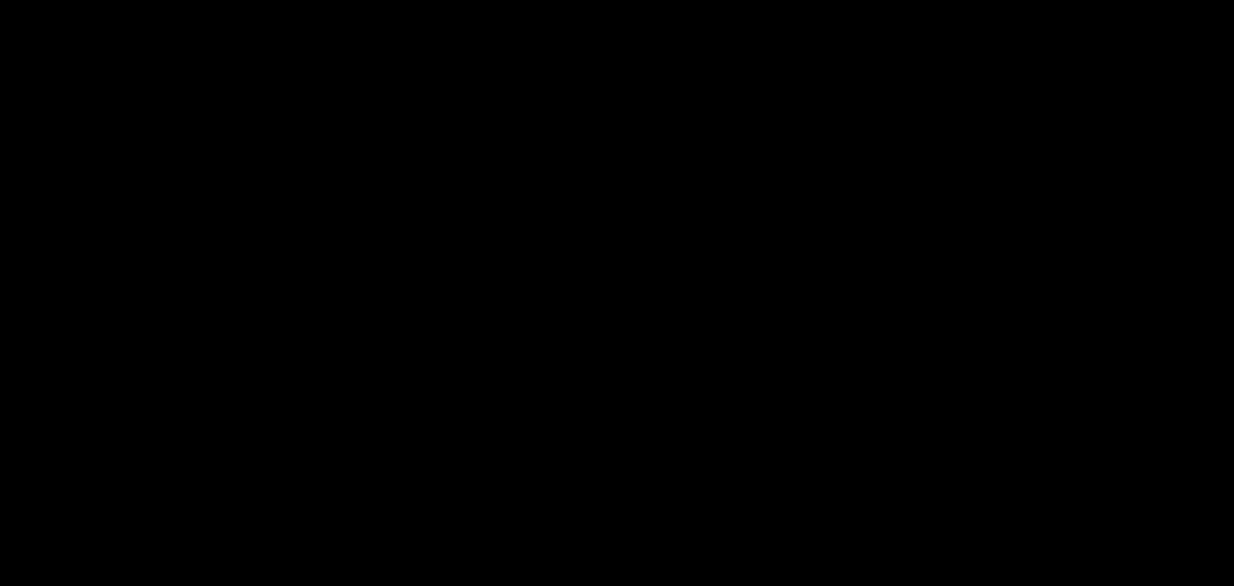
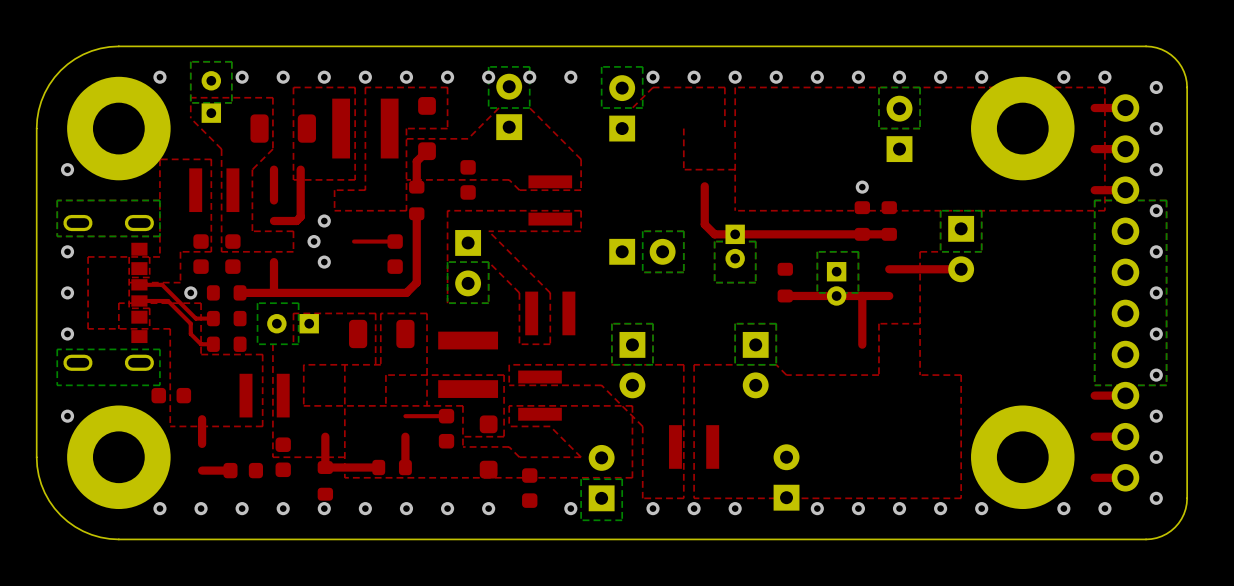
board edge: none -> (1146, 46) (118, 46) (91, 50) (75, 58) (54, 77) (41, 101) (37, 119) (36, 457) (41, 484) (54, 508) (75, 526) (100, 537) (118, 539) (1146, 539) (1161, 536) (1178, 523) (1183, 514) (1187, 498) (1187, 87) (1183, 71) (1175, 58) (1161, 49) (1146, 46)
bottom zone outline: none -> (231, 61) (190, 61) (190, 102) (231, 102) (231, 61)
bottom zone outline: none -> (529, 66) (488, 66) (488, 108) (529, 108) (529, 66)
bottom zone outline: none -> (642, 66) (642, 108) (601, 108) (601, 66) (642, 66)
via: none -> (159, 77)
via: none -> (242, 77)
via: none -> (283, 77)
via: none -> (324, 77)
via: none -> (365, 77)
via: none -> (406, 77)
via: none -> (447, 77)
via: none -> (488, 77)
via: none -> (529, 77)
via: none -> (570, 77)
via: none -> (652, 77)
via: none -> (694, 77)
via: none -> (735, 77)
via: none -> (776, 77)
via: none -> (817, 77)
via: none -> (858, 77)
via: none -> (899, 77)
via: none -> (940, 77)
via: none -> (981, 77)
via: none -> (1063, 77)
via: none -> (1104, 77)
top zone outline: none -> (355, 87) (355, 179) (293, 179) (293, 87) (355, 87)
top zone outline: none -> (447, 87) (365, 87) (365, 190) (334, 190) (334, 210) (406, 210) (406, 128) (447, 128) (447, 87)
bottom zone outline: none -> (920, 87) (878, 87) (878, 128) (920, 128) (920, 87)
top zone outline: none -> (1104, 87) (1104, 210) (735, 210) (735, 87) (1104, 87)
via: none -> (1156, 87)
part: none -> (211, 96)
top zone outline: none -> (190, 97) (272, 97) (272, 149) (252, 169) (252, 231) (293, 231) (293, 251) (221, 251) (221, 149) (190, 118) (190, 61) (231, 61) (231, 102) (190, 102)
part: none -> (509, 106)
top zone outline: none -> (498, 108) (468, 138) (406, 138)
top zone outline: none -> (529, 108) (581, 159) (581, 190) (519, 190) (509, 179) (406, 179)
part: none -> (622, 108)
top zone outline: none -> (632, 108) (652, 87) (724, 87) (724, 128)
top track: none -> (1125, 108) (1094, 108)
part: none -> (118, 128)
part: none -> (283, 128)
part: none -> (365, 128)
part: none -> (427, 128)
top zone outline: none -> (683, 128) (683, 169) (735, 169)
part: none -> (899, 128)
part: none -> (1022, 128)
via: none -> (1156, 128)
top track: none -> (1125, 149) (1094, 149)
top track: none -> (427, 151) (416, 161) (416, 187)
via: none -> (67, 169)
top track: none -> (273, 169) (273, 200)
top track: none -> (300, 169) (300, 216) (296, 221) (273, 221)
via: none -> (1156, 169)
part: none -> (468, 179)
top track: none -> (704, 186) (704, 224) (714, 234) (889, 234)
via: none -> (862, 187)
part: none -> (214, 190)
top track: none -> (1125, 190) (1094, 190)
bottom zone outline: none -> (159, 200) (159, 236) (57, 236) (57, 200) (159, 200)
part: none -> (416, 200)
part: none -> (550, 200)
bottom zone outline: none -> (1166, 200) (1094, 200) (1094, 385) (1166, 385) (1166, 200)
bottom zone outline: none -> (981, 210) (940, 210) (940, 251) (981, 251) (981, 210)
top zone outline: none -> (981, 210) (981, 251) (920, 251) (920, 375) (961, 375) (961, 498) (694, 498) (694, 364) (776, 364)
via: none -> (1156, 210)
top track: none -> (416, 213) (416, 282) (406, 292) (240, 292)
via: none -> (324, 221)
part: none -> (862, 221)
part: none -> (889, 221)
bottom zone outline: none -> (683, 231) (642, 231) (642, 272) (683, 272) (683, 231)
via: none -> (314, 241)
top track: none -> (395, 241) (354, 241)
bottom zone outline: none -> (755, 241) (714, 241) (714, 282) (755, 282) (755, 241)
part: none -> (735, 246)
part: none -> (961, 249)
via: none -> (67, 251)
part: none -> (642, 251)
bottom zone outline: none -> (858, 251) (817, 251) (817, 292) (858, 292) (858, 251)
via: none -> (1156, 251)
part: none -> (201, 254)
part: none -> (232, 254)
part: none -> (395, 254)
top zone outline: none -> (129, 256) (129, 308) (149, 308) (149, 328)
top zone outline: none -> (149, 256) (149, 277) (129, 277)
top track: none -> (273, 262) (273, 292)
via: none -> (324, 262)
bottom zone outline: none -> (488, 262) (447, 262) (447, 303) (488, 303) (488, 262)
top zone outline: none -> (488, 262) (519, 292) (519, 344) (550, 344) (550, 292) (488, 231) (581, 231) (581, 210) (447, 210) (447, 303) (488, 303) (488, 262)
part: none -> (468, 263)
top track: none -> (961, 269) (889, 269)
top zone outline: none -> (129, 282) (180, 282) (180, 251) (211, 251) (211, 159) (159, 159) (159, 256) (88, 256) (88, 328) (170, 328) (170, 426) (262, 426) (262, 354) (201, 354) (201, 303) (118, 303) (118, 328)
part: none -> (785, 282)
part: none -> (836, 283)
top track: none -> (139, 284) (162, 284) (195, 318) (213, 318)
via: none -> (67, 292)
part: none -> (108, 292)
via: none -> (190, 292)
part: none -> (226, 292)
part: none -> (1125, 292)
via: none -> (1156, 292)
top track: none -> (862, 295) (862, 344)
top track: none -> (889, 295) (785, 295)
top track: none -> (139, 300) (168, 300) (190, 323) (190, 333) (201, 344) (213, 344)
bottom zone outline: none -> (298, 303) (257, 303) (257, 344) (298, 344) (298, 303)
part: none -> (550, 313)
part: none -> (226, 318)
part: none -> (293, 323)
bottom zone outline: none -> (652, 323) (611, 323) (611, 364) (652, 364) (652, 323)
bottom zone outline: none -> (776, 323) (735, 323) (735, 364) (776, 364) (776, 323)
top zone outline: none -> (920, 323) (878, 323) (878, 375) (786, 375) (776, 364)
via: none -> (67, 333)
part: none -> (381, 333)
via: none -> (1156, 333)
part: none -> (226, 344)
top zone outline: none -> (272, 344) (272, 457) (344, 457)
top zone outline: none -> (293, 344) (293, 313) (375, 313) (375, 364)
bottom zone outline: none -> (159, 349) (57, 349) (57, 385) (159, 385) (159, 349)
top zone outline: none -> (344, 364) (344, 477) (632, 477) (632, 405) (509, 405) (509, 426) (550, 426) (581, 457) (519, 457) (509, 446) (462, 446) (462, 405) (303, 405) (303, 364) (380, 364) (380, 313) (427, 313) (427, 405)
part: none -> (468, 364)
top zone outline: none -> (683, 364) (509, 364) (509, 385) (601, 385) (642, 426) (642, 498) (683, 498) (683, 364)
part: none -> (632, 365)
part: none -> (755, 365)
via: none -> (1156, 375)
part: none -> (171, 395)
part: none -> (264, 395)
part: none -> (540, 395)
top track: none -> (1125, 395) (1094, 395)
top zone outline: none -> (385, 405) (385, 375) (504, 375) (504, 436) (462, 436)
via: none -> (67, 416)
top track: none -> (446, 416) (405, 416)
via: none -> (1156, 416)
top track: none -> (202, 419) (202, 443)
part: none -> (446, 428)
top track: none -> (325, 436) (325, 467) (378, 467)
top track: none -> (405, 436) (405, 467)
top track: none -> (1125, 436) (1094, 436)
part: none -> (488, 446)
part: none -> (694, 446)
part: none -> (118, 457)
part: none -> (283, 457)
part: none -> (1022, 457)
via: none -> (1156, 457)
part: none -> (392, 467)
top track: none -> (230, 470) (202, 470)
part: none -> (243, 470)
part: none -> (786, 477)
top track: none -> (1125, 477) (1094, 477)
part: none -> (601, 478)
bottom zone outline: none -> (622, 479) (581, 479) (581, 520) (622, 520) (622, 479)
part: none -> (325, 480)
part: none -> (529, 488)
via: none -> (1156, 498)
via: none -> (159, 508)
via: none -> (201, 508)
via: none -> (242, 508)
via: none -> (283, 508)
via: none -> (324, 508)
via: none -> (365, 508)
via: none -> (406, 508)
via: none -> (447, 508)
via: none -> (488, 508)
via: none -> (570, 508)
via: none -> (652, 508)
via: none -> (694, 508)
via: none -> (735, 508)
via: none -> (817, 508)
via: none -> (858, 508)
via: none -> (899, 508)
via: none -> (940, 508)
via: none -> (981, 508)
via: none -> (1063, 508)
via: none -> (1104, 508)

